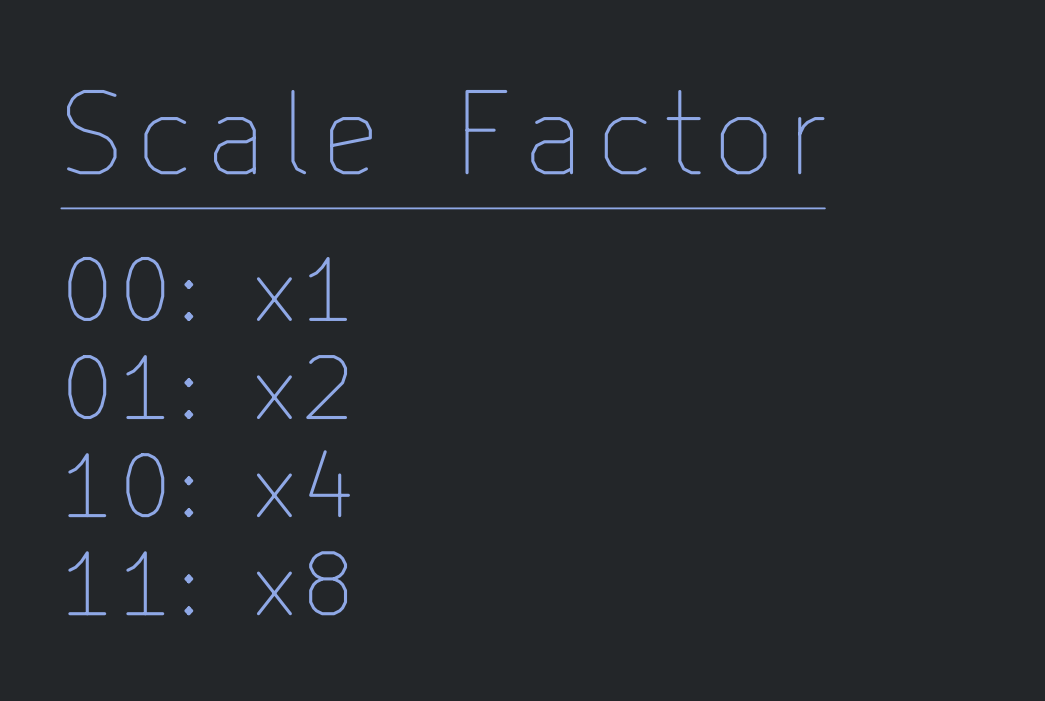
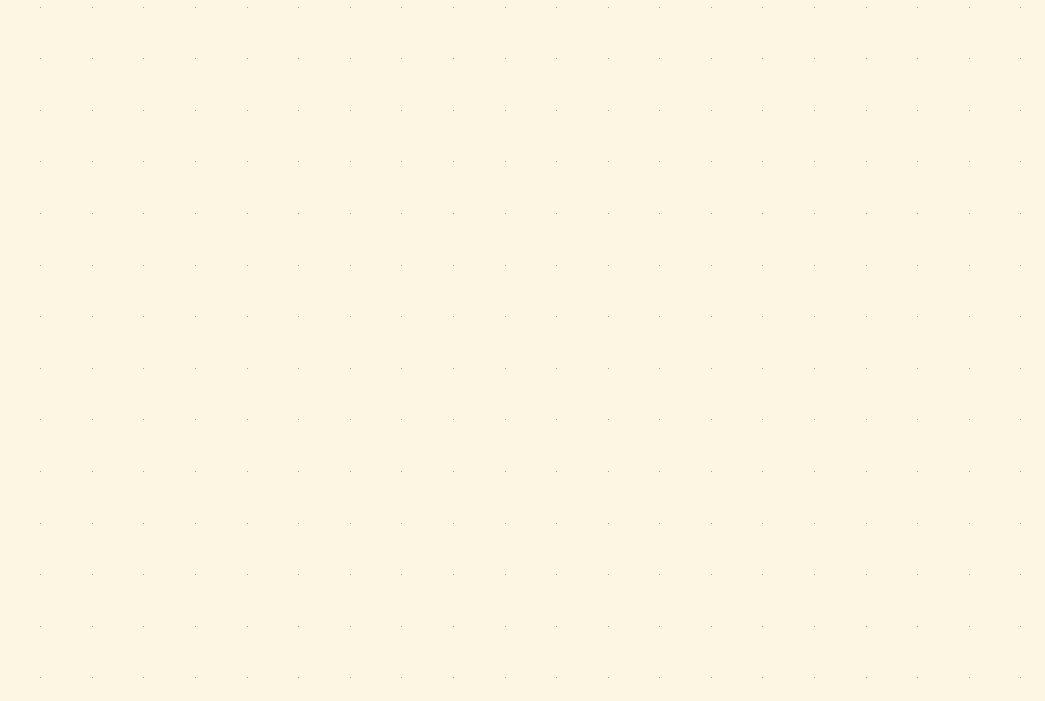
text: Scale Factor (445, 132) -> none
line: (61, 208) (824, 208) -> none
text: 00: x1 (207, 288) -> none
text: 01: x2 (207, 387) -> none
text: 10: x4 (209, 483) -> none
text: 11: x8 (207, 583) -> none

